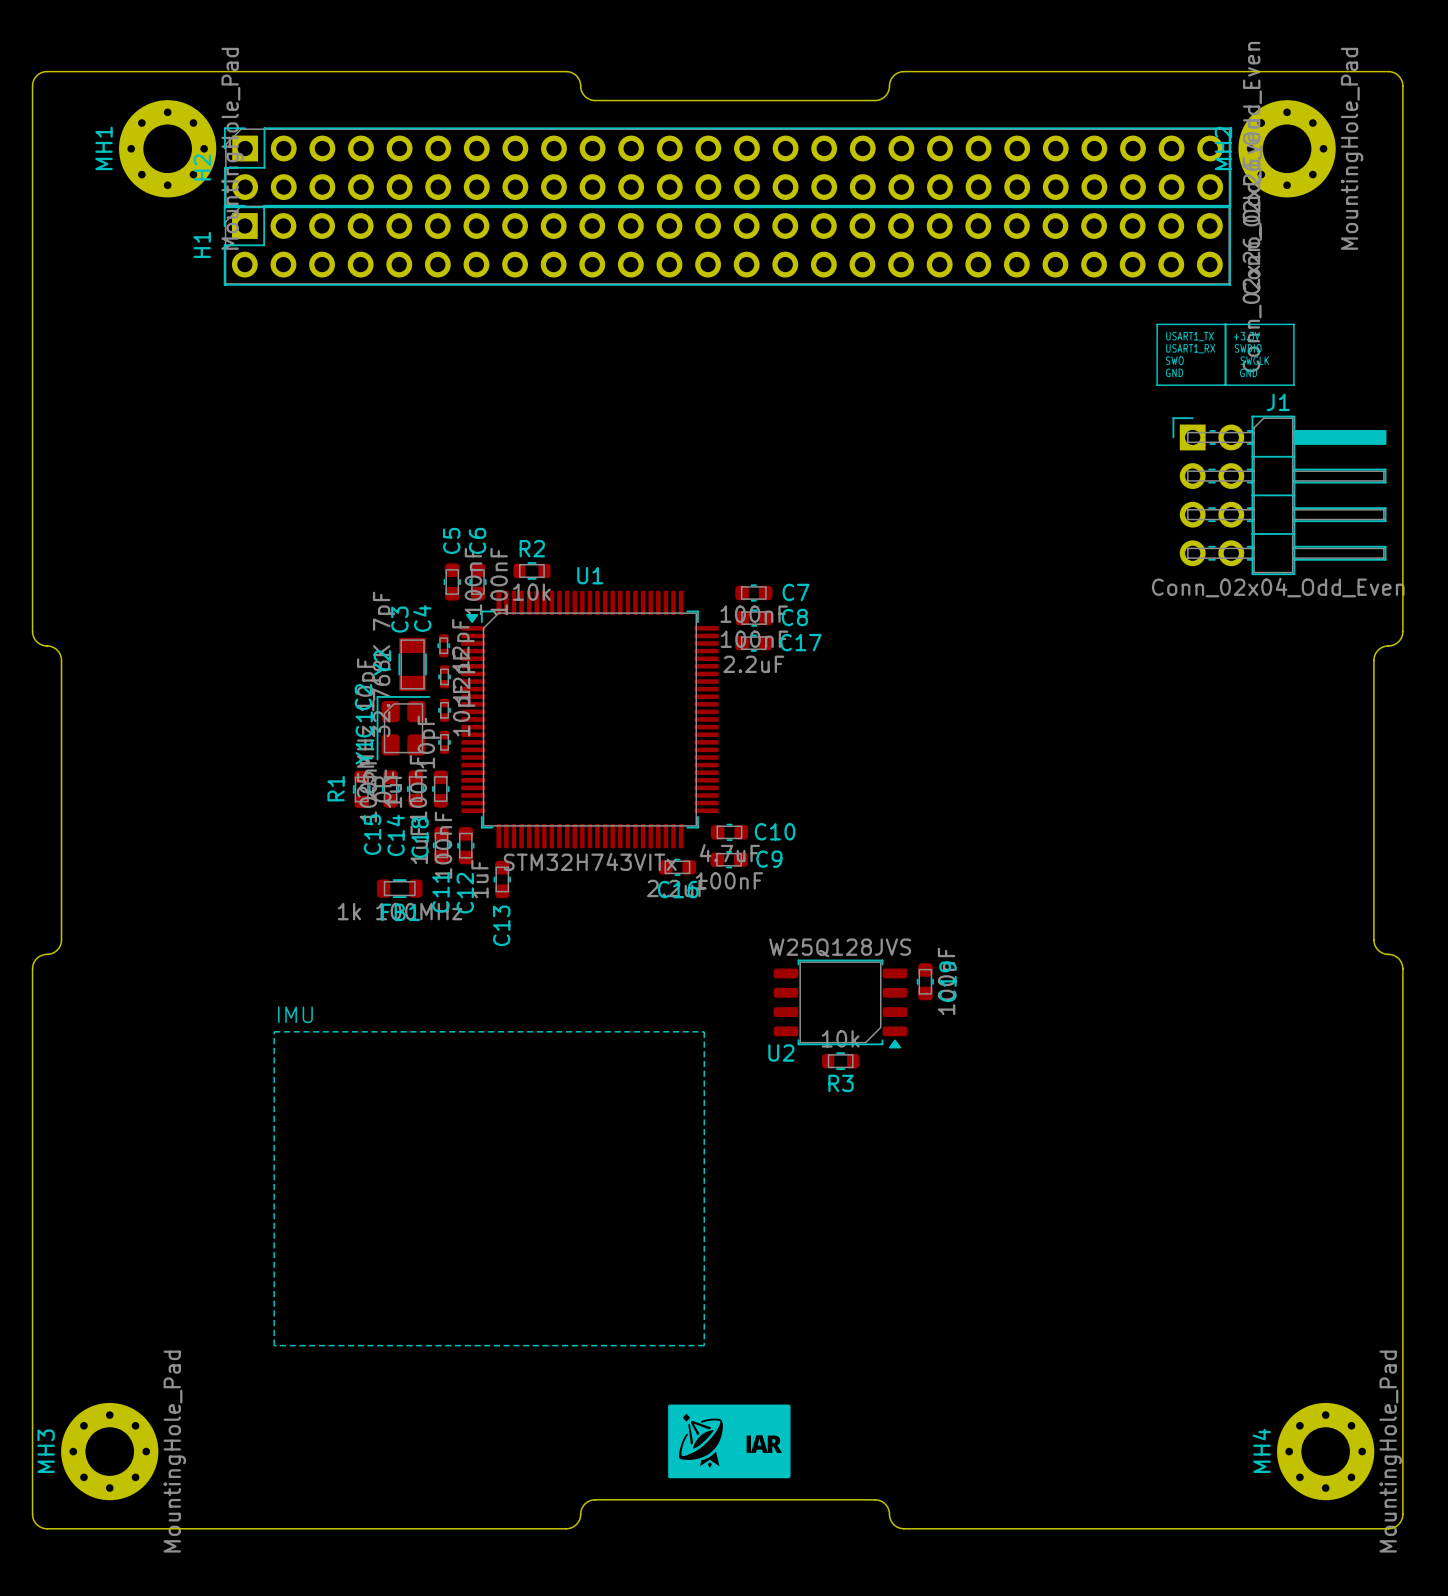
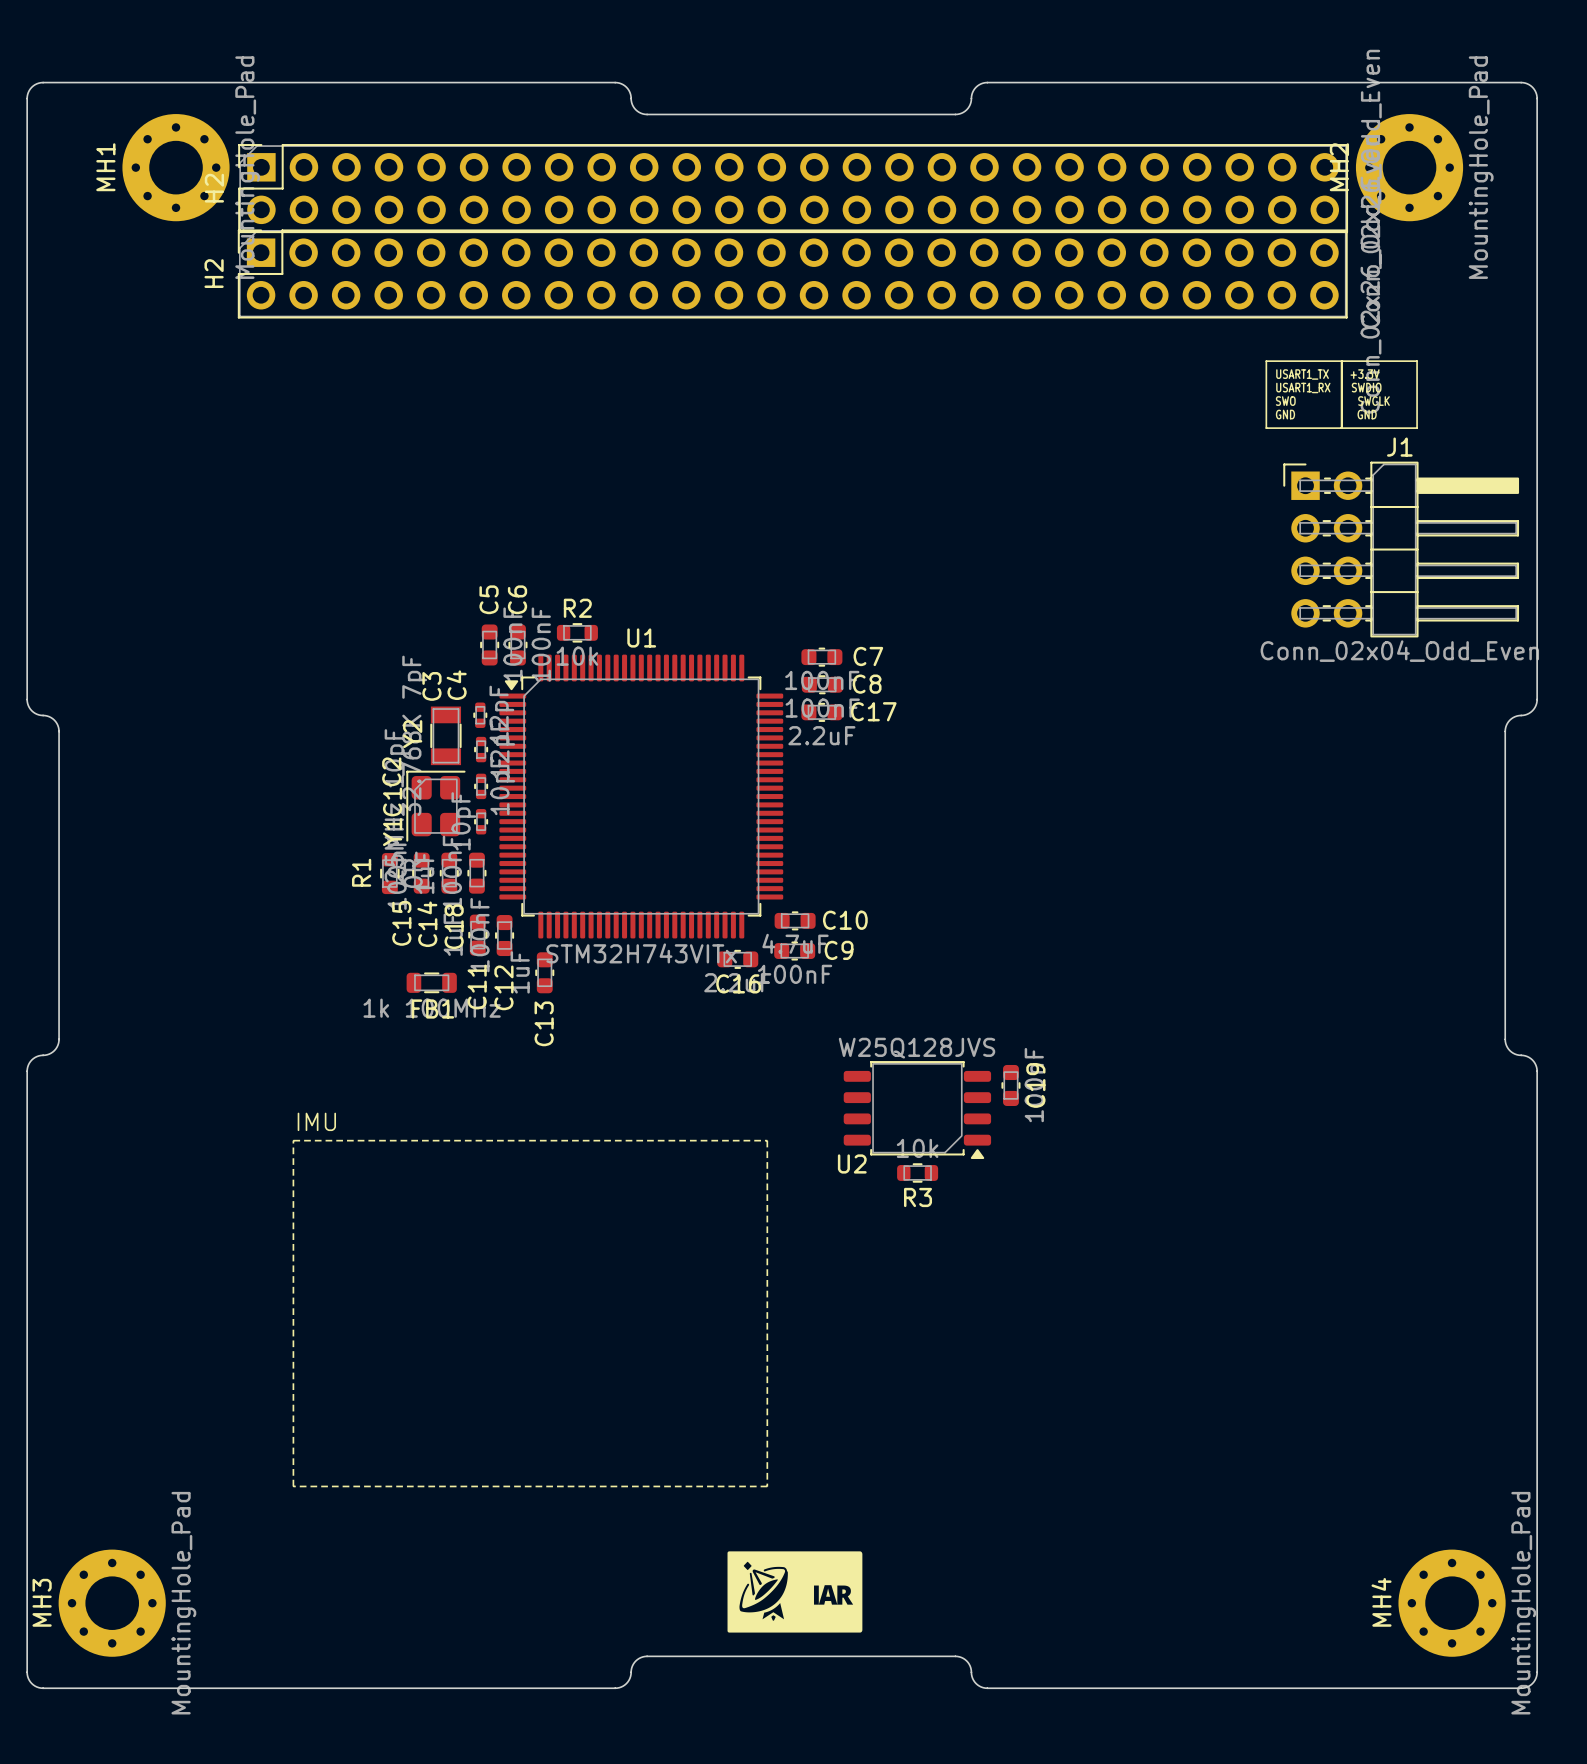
H1 name: H1 (202, 244) -> H2 (214, 273)

